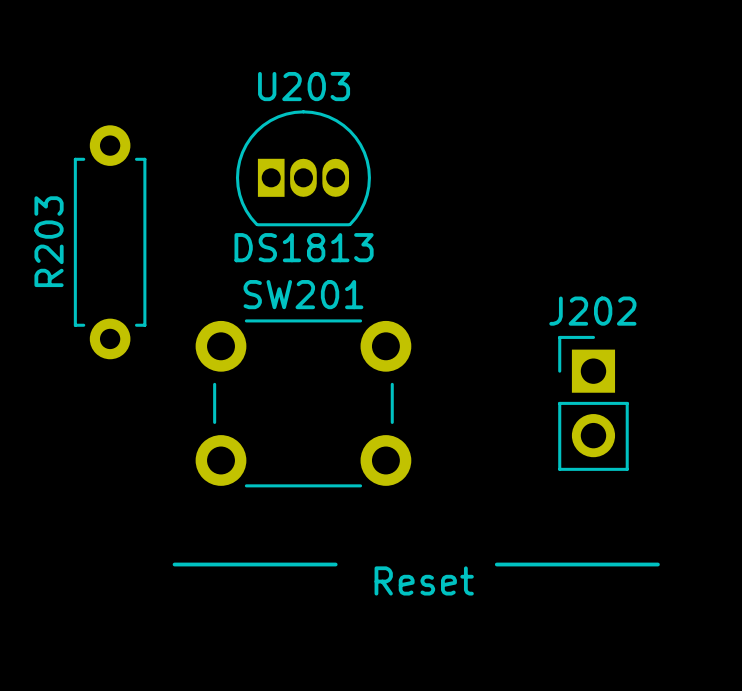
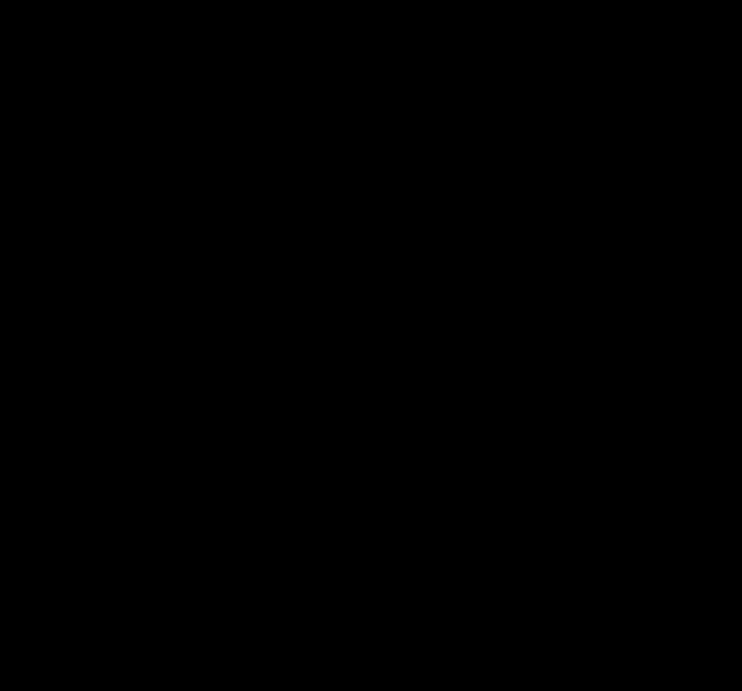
U203: DS1813 (303, 168) -> none
R203: (110, 242) -> none
SW201: (303, 403) -> none
J202: (593, 403) -> none
line: (174, 564) (335, 564) -> none
line: (496, 564) (657, 564) -> none
text: Reset (424, 580) -> none

